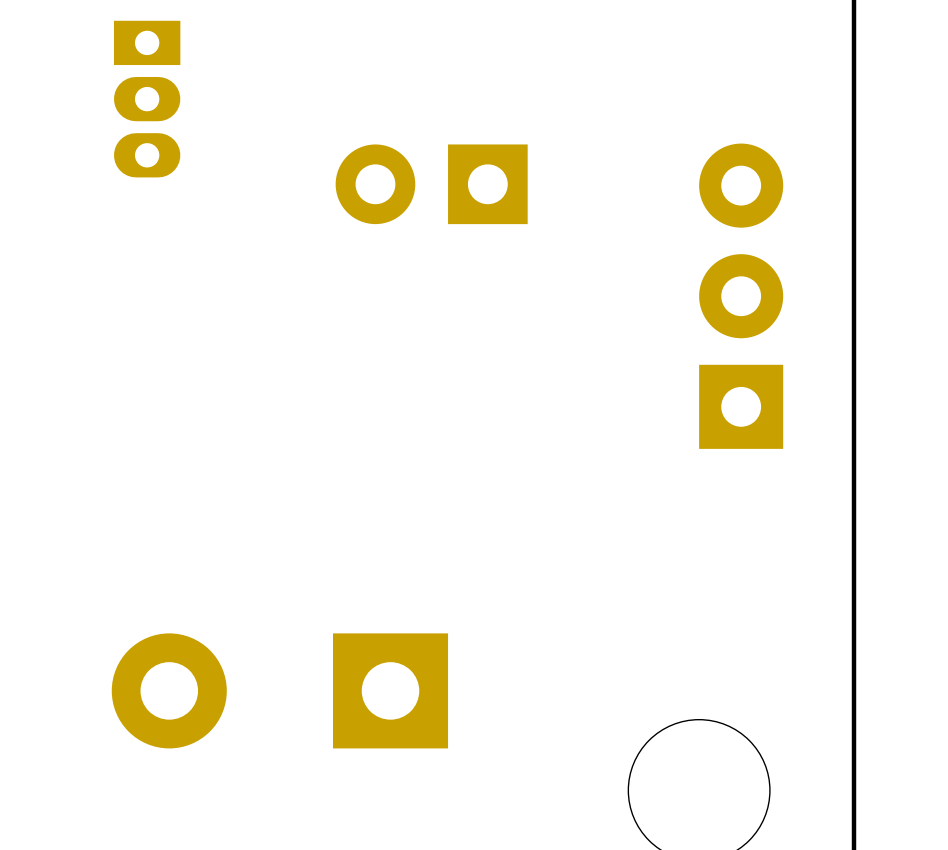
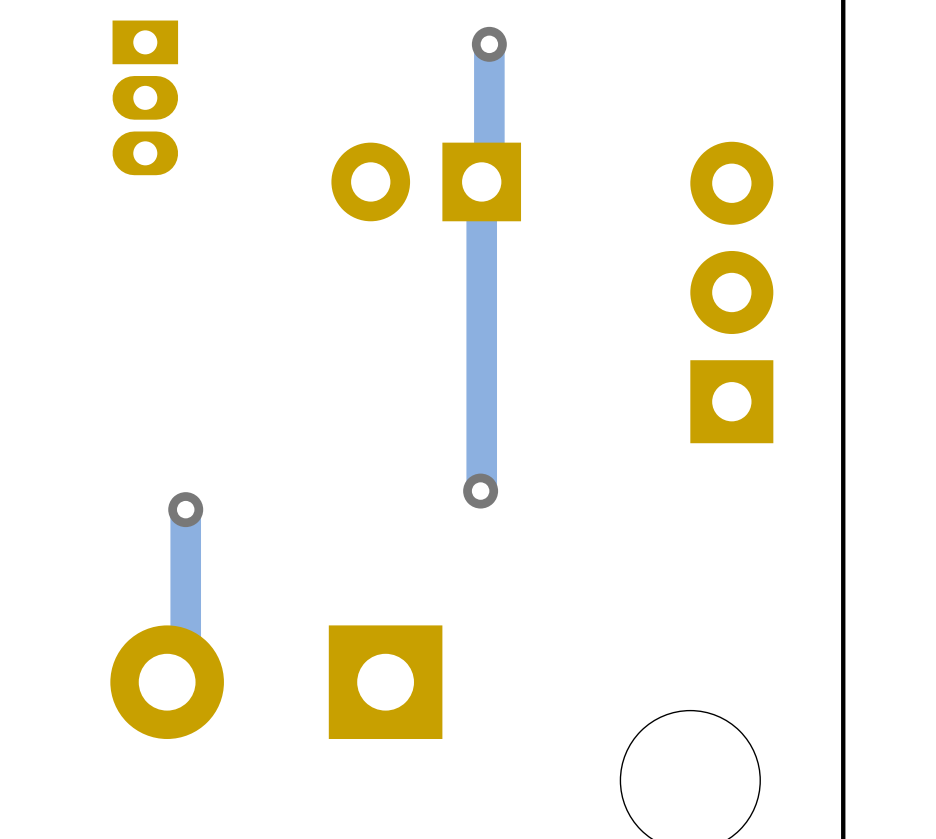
track: none -> (489, 44) (489, 174) (481, 181) (480, 491)
via: none -> (489, 44)
via: none -> (480, 491)
track: none -> (185, 509) (185, 663) (167, 682)
via: none -> (185, 509)

